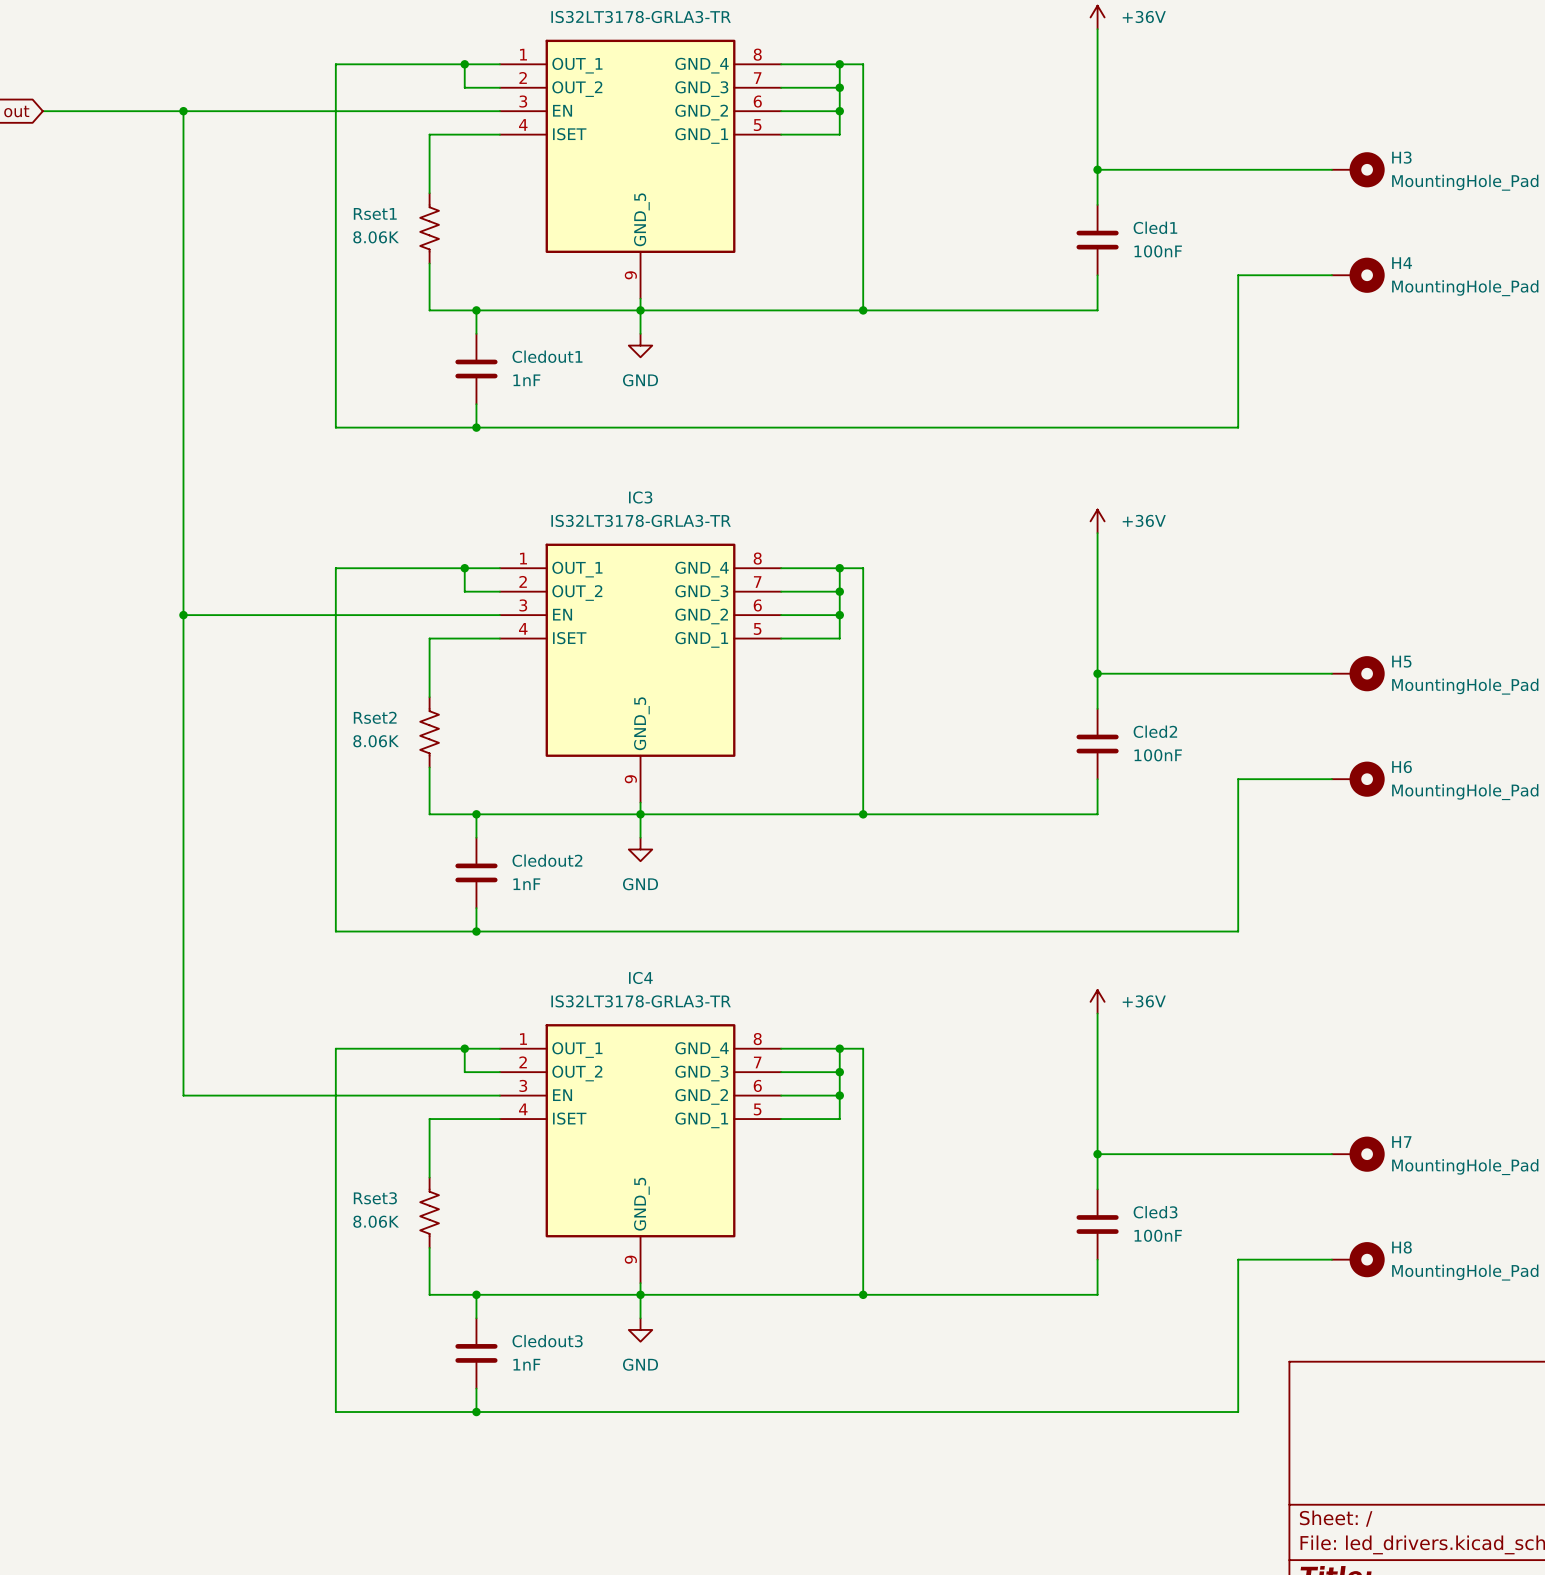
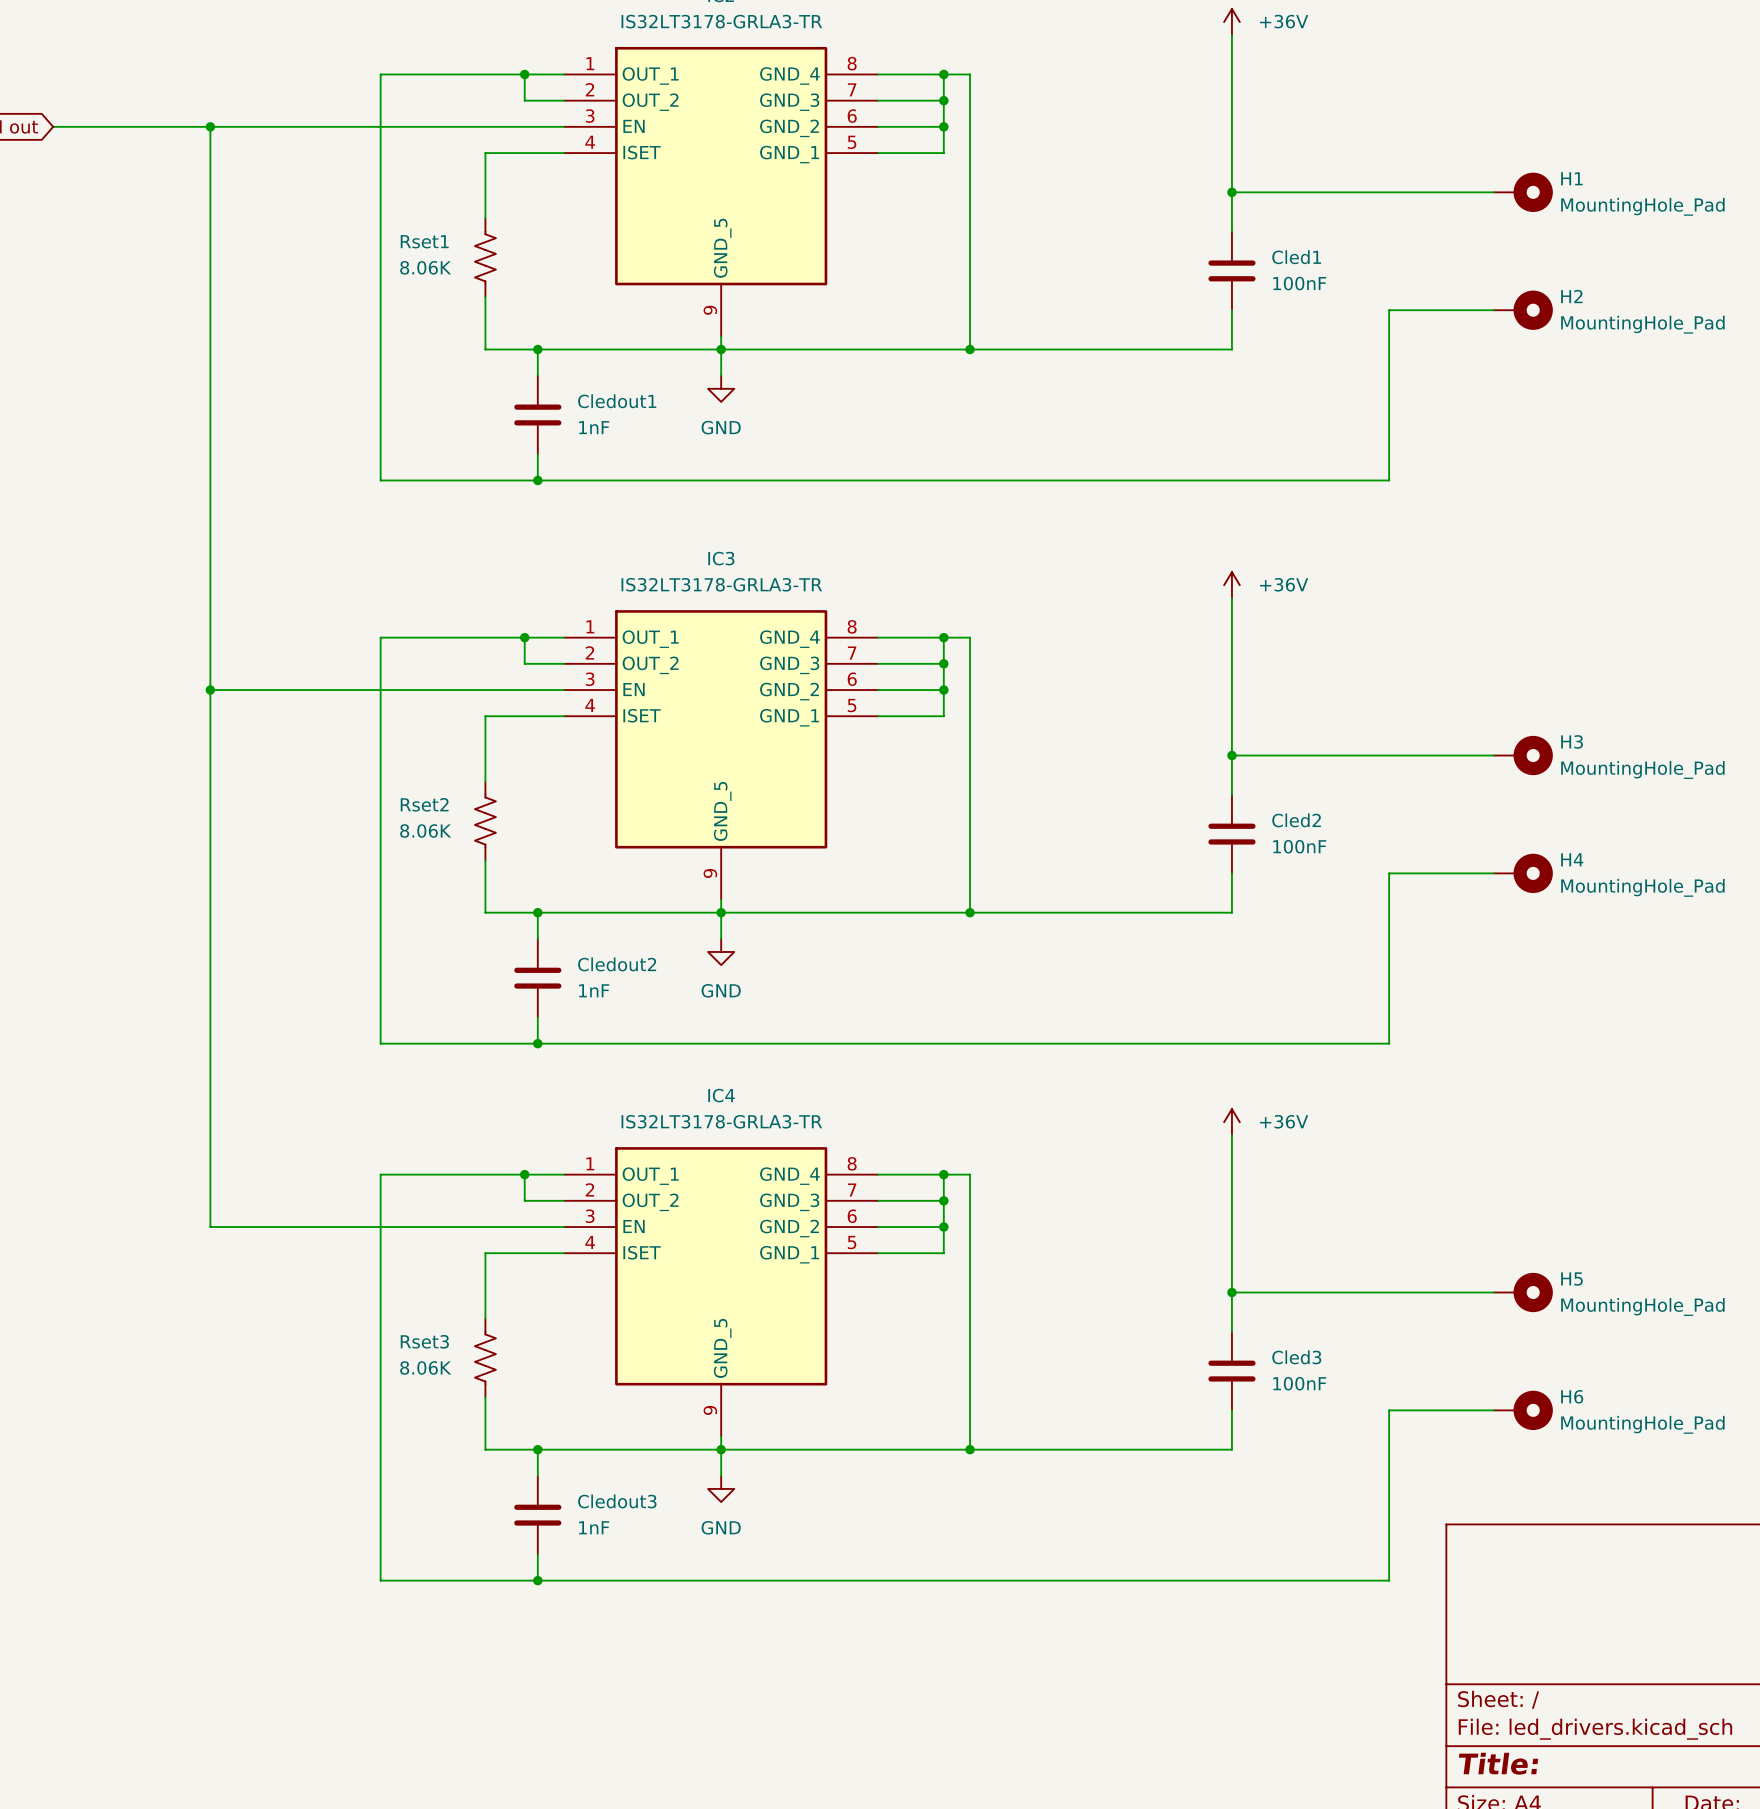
H3 name: H3 (1401, 157) -> H1 (1571, 178)
H4 name: H4 (1402, 263) -> H2 (1571, 296)
H5 name: H5 (1401, 661) -> H3 (1572, 741)
H6 name: H6 (1401, 767) -> H4 (1572, 859)
H7 name: H7 (1401, 1142) -> H5 (1571, 1279)
H8 name: H8 (1401, 1247) -> H6 (1572, 1396)

